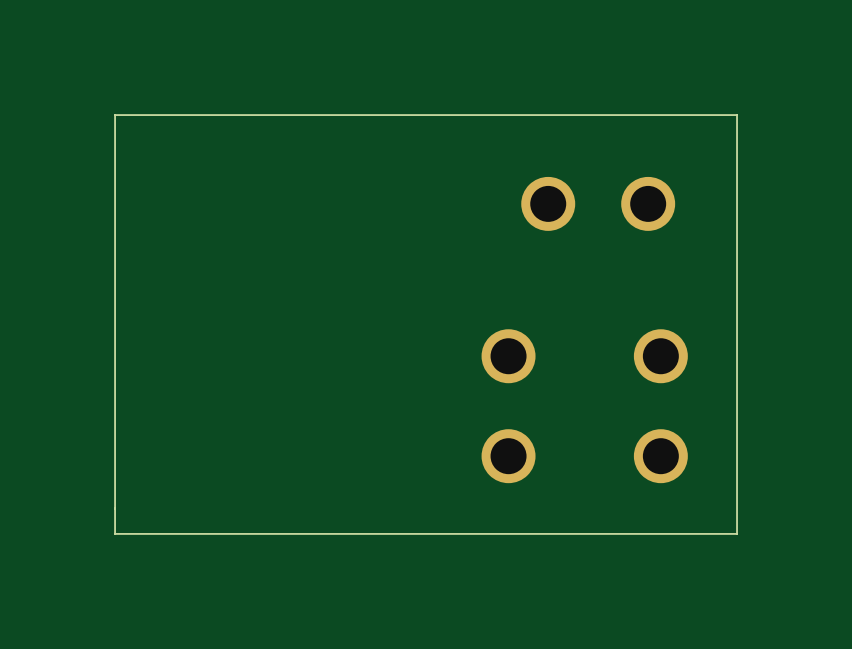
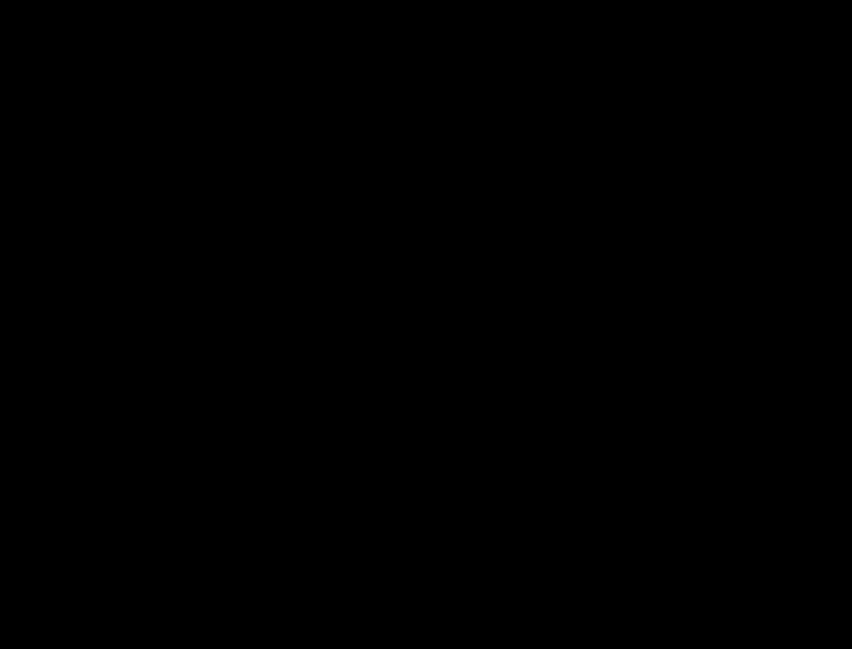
board edge: (737, 115) (115, 115) (115, 533) (737, 533) (737, 115) -> none
part: (598, 203) -> none
part: (508, 406) -> none
part: (660, 406) -> none

